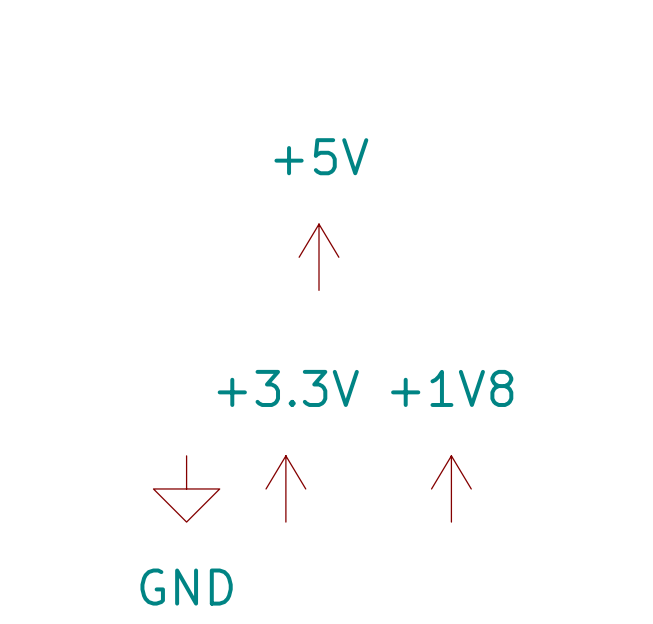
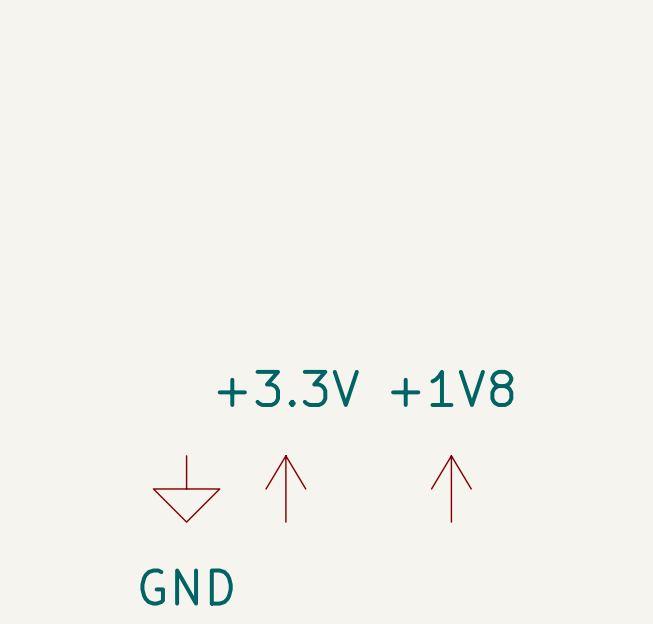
power symbol: +5V (319, 257) -> none

